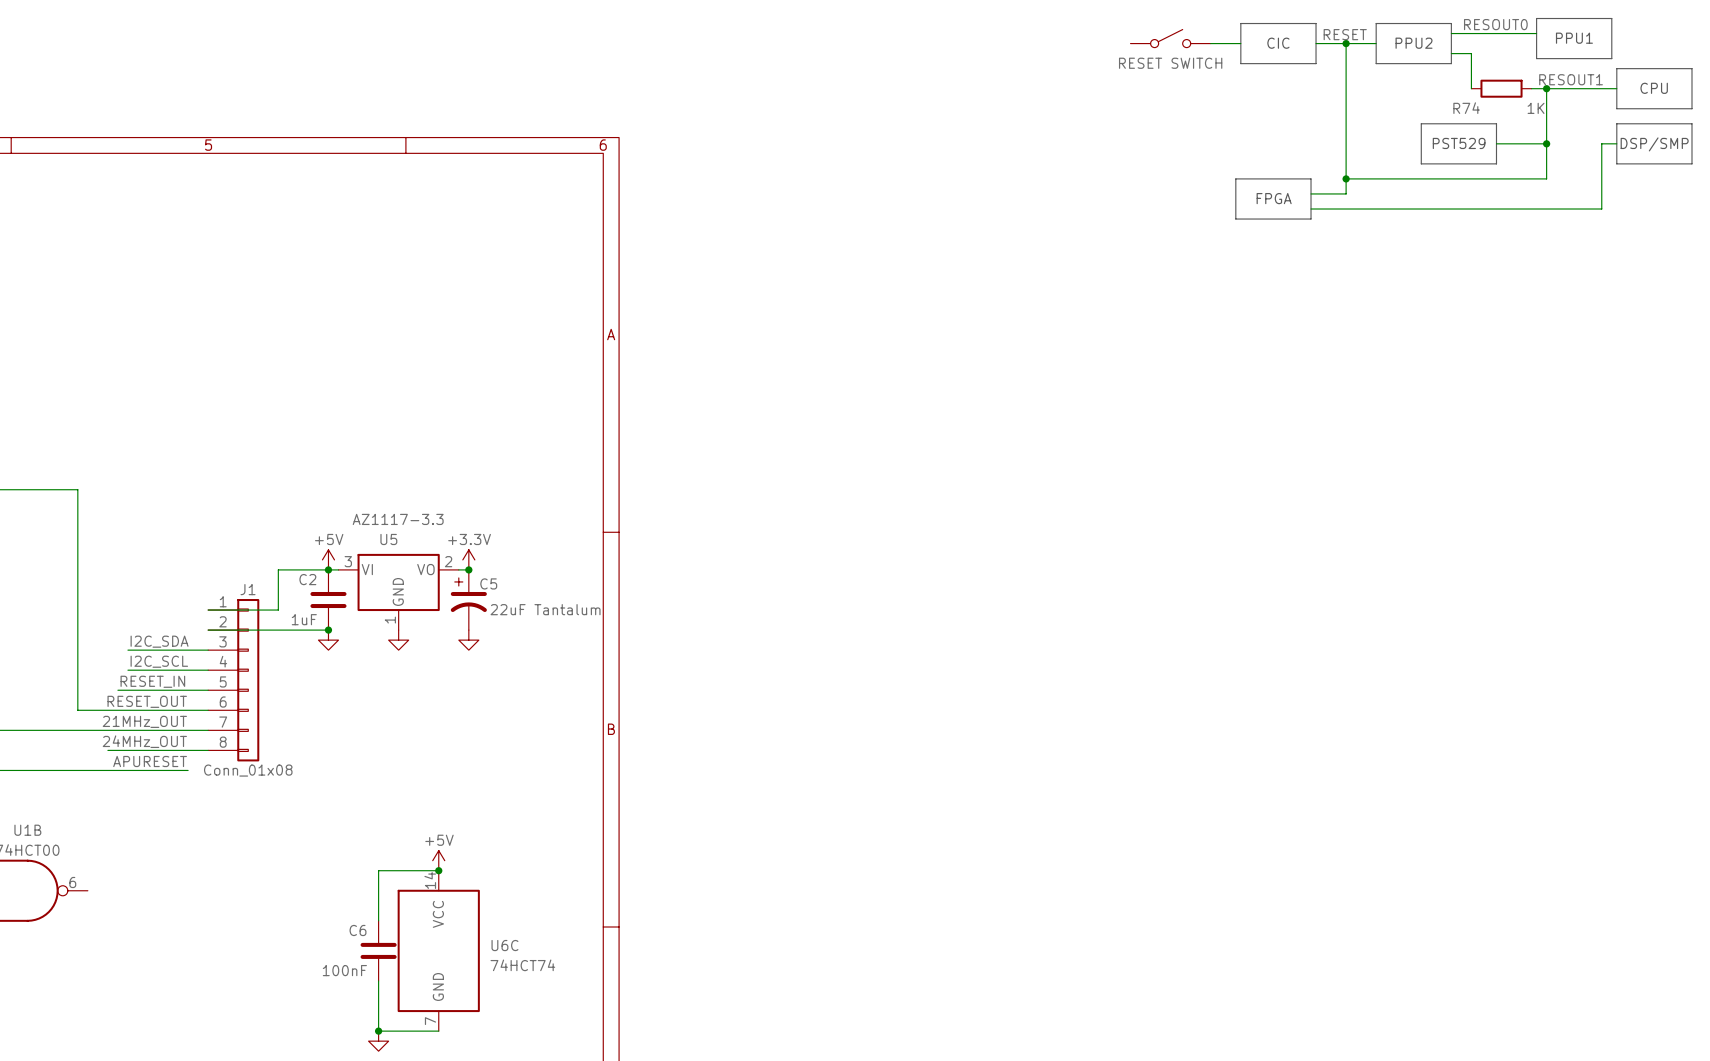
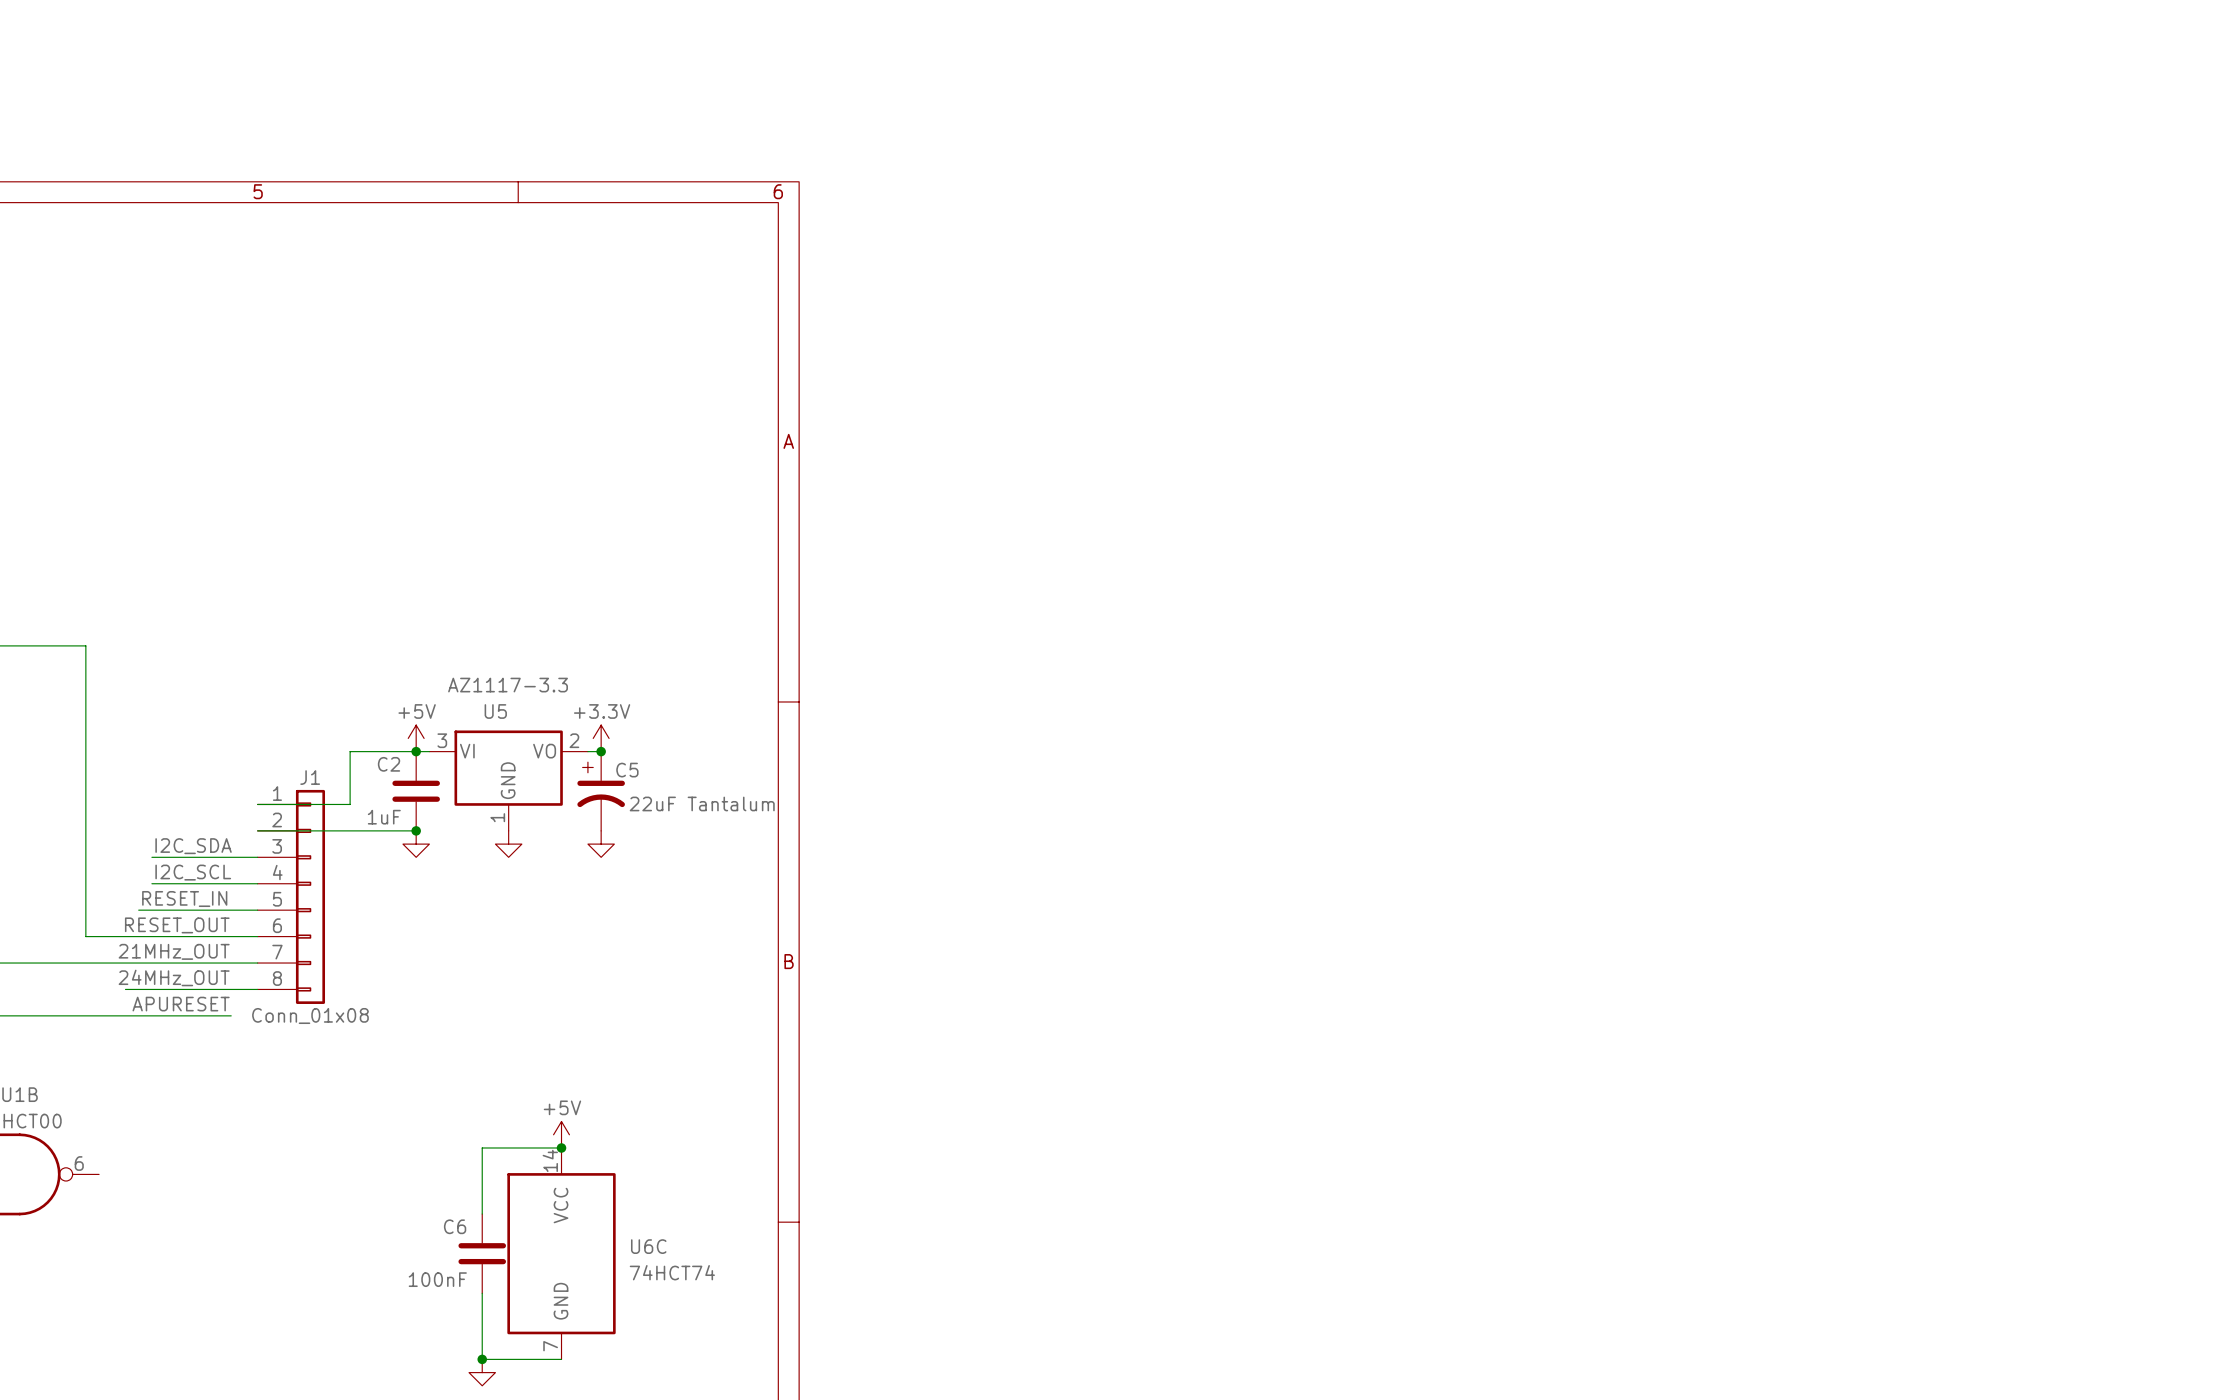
line: (1536, 18) (1611, 18) (1611, 58) (1536, 58) (1536, 18) -> none
line: (1240, 23) (1316, 23) (1316, 63) (1240, 63) (1240, 23) -> none
line: (1376, 23) (1451, 23) (1451, 63) (1376, 63) (1376, 23) -> none
label: RESOUT0 (1495, 24) -> none
wire: (1451, 33) (1536, 33) -> none
label: RESET (1345, 34) -> none
part: RESET SWITCH (1170, 38) -> none
text: PPU1 (1574, 38) -> none
wire: (1210, 43) (1240, 43) -> none
text: CIC (1278, 43) -> none
wire: (1316, 43) (1376, 43) -> none
wire: (1346, 43) (1346, 193) (1311, 193) -> none
junction: (1346, 43) -> none
text: PPU2 (1414, 43) -> none
wire: (1451, 53) (1471, 53) (1471, 88) -> none
line: (1616, 68) (1616, 108) (1691, 108) (1691, 68) (1616, 68) -> none
label: RESOUT1 (1571, 79) -> none
R74: 1K (1501, 88) -> none
wire: (1531, 88) (1616, 88) -> none
wire: (1546, 88) (1546, 178) (1346, 178) -> none
junction: (1546, 88) -> none
text: CPU (1654, 88) -> none
line: (1421, 123) (1496, 123) (1496, 163) (1421, 163) (1421, 123) -> none
line: (1616, 123) (1691, 123) (1691, 163) (1616, 163) (1616, 123) -> none
text: PST529 (1459, 143) -> none
wire: (1496, 143) (1546, 143) -> none
junction: (1546, 143) -> none
wire: (1616, 143) (1601, 143) (1601, 209) (1311, 209) -> none
text: DSP/SMP (1654, 144) -> none
line: (1235, 178) (1311, 178) (1311, 219) (1235, 219) (1235, 178) -> none
junction: (1346, 178) -> none
text: FPGA (1274, 198) -> none

